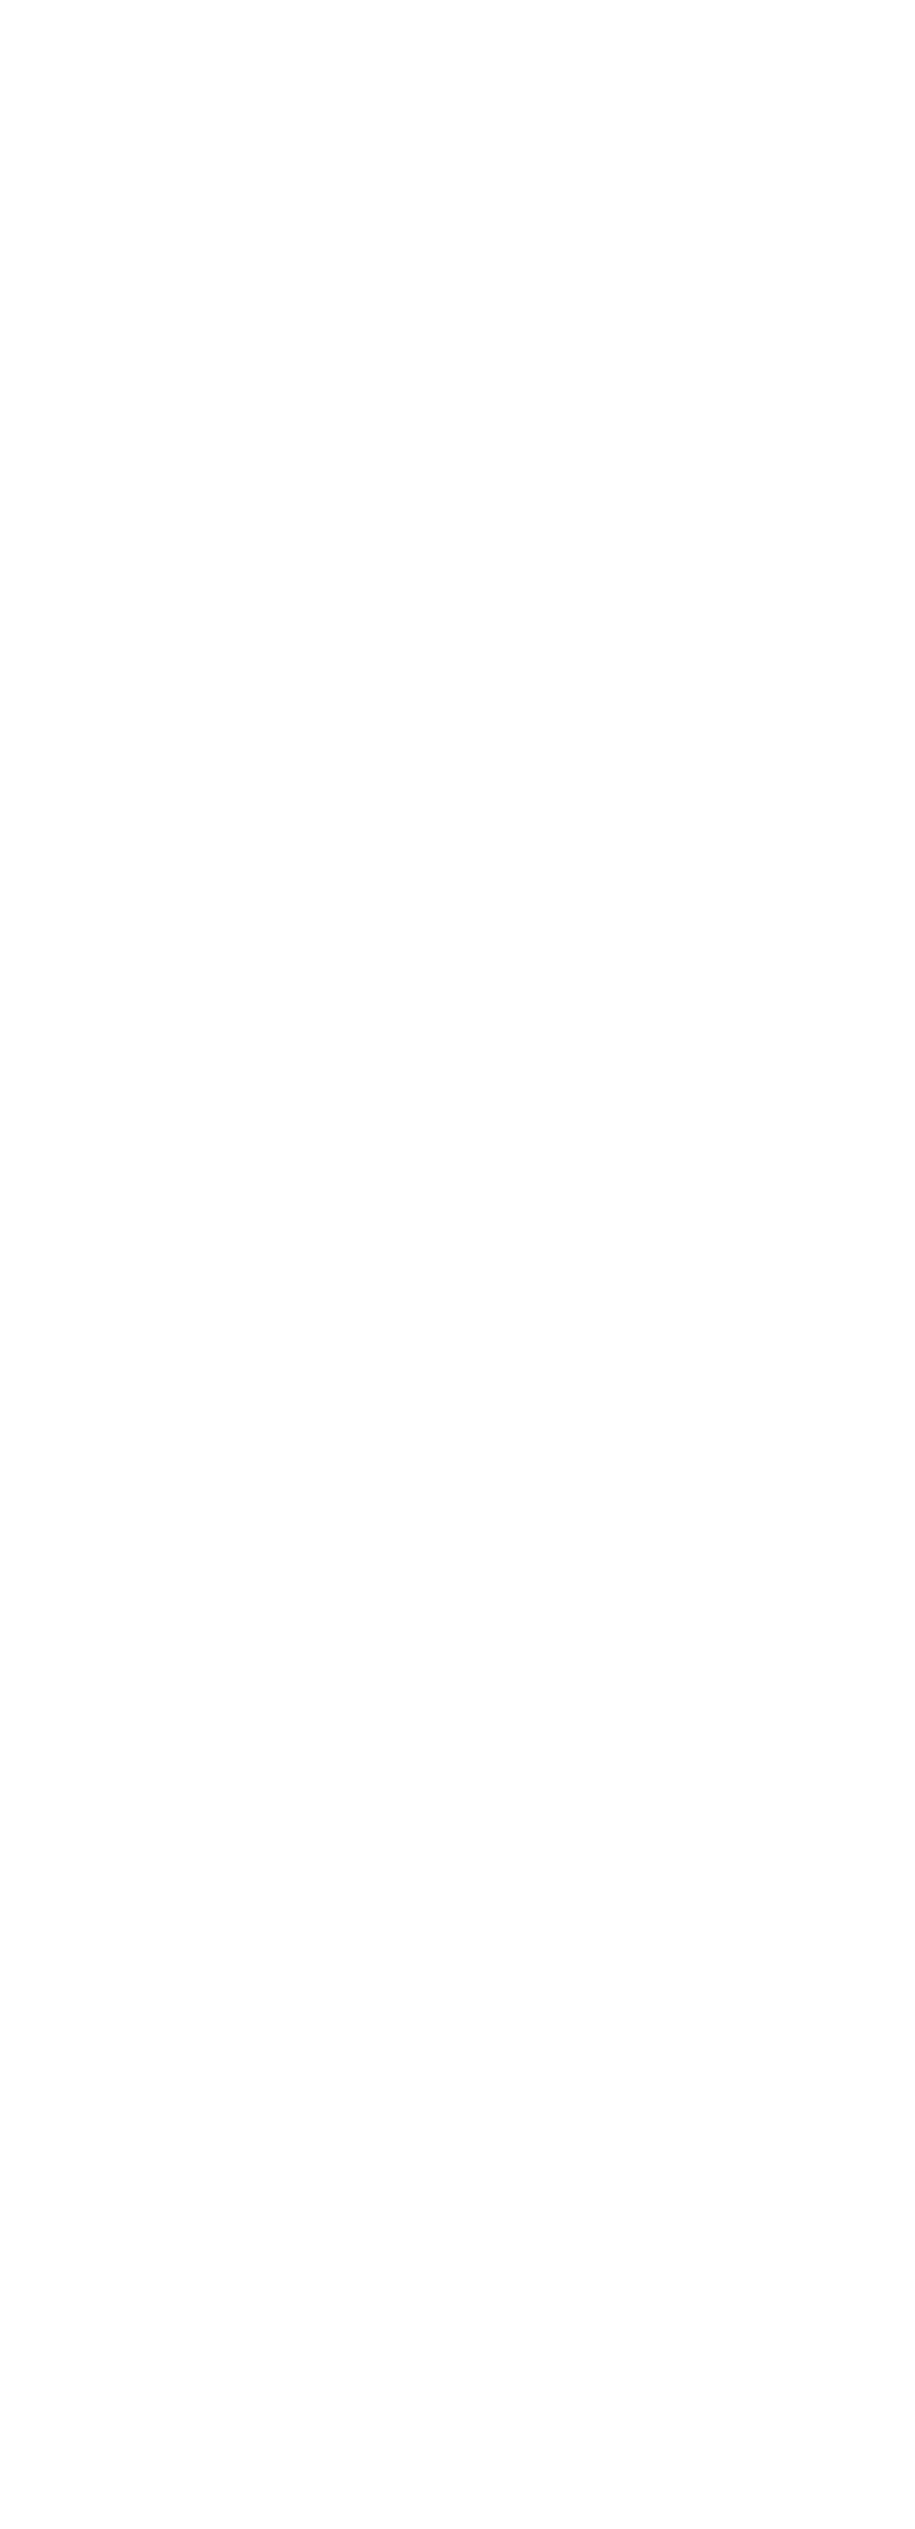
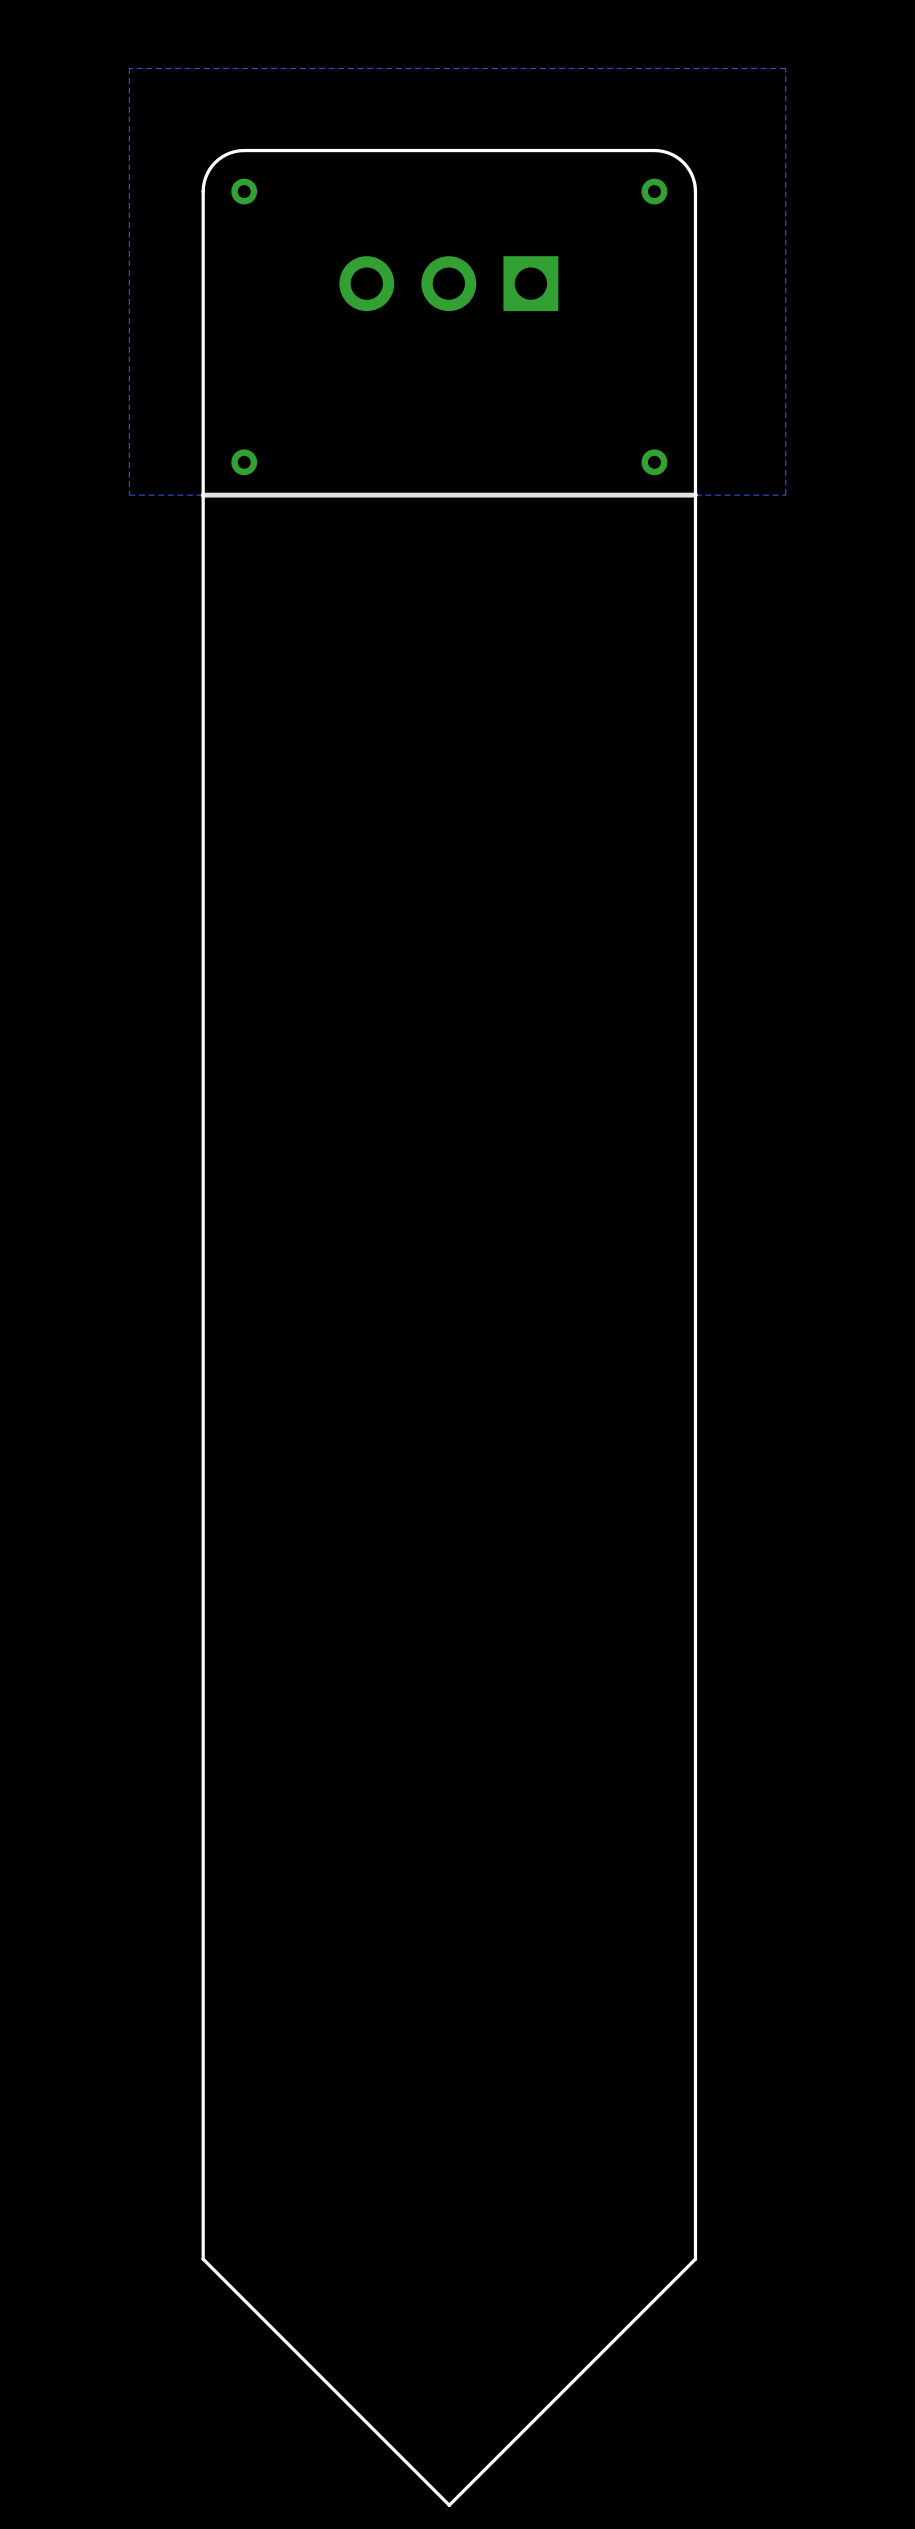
zone outline: none -> (785, 68) (785, 495) (129, 495) (129, 68) (785, 68)
board edge: none -> (654, 150) (239, 150) (226, 154) (215, 162) (207, 173) (203, 186) (203, 2259) (449, 2505) (695, 2259) (695, 191) (693, 178) (683, 162) (667, 152) (654, 150)
via: none -> (244, 191)
via: none -> (654, 191)
part: none -> (448, 283)
via: none -> (244, 462)
via: none -> (654, 462)
line: none -> (695, 495) (203, 495)

